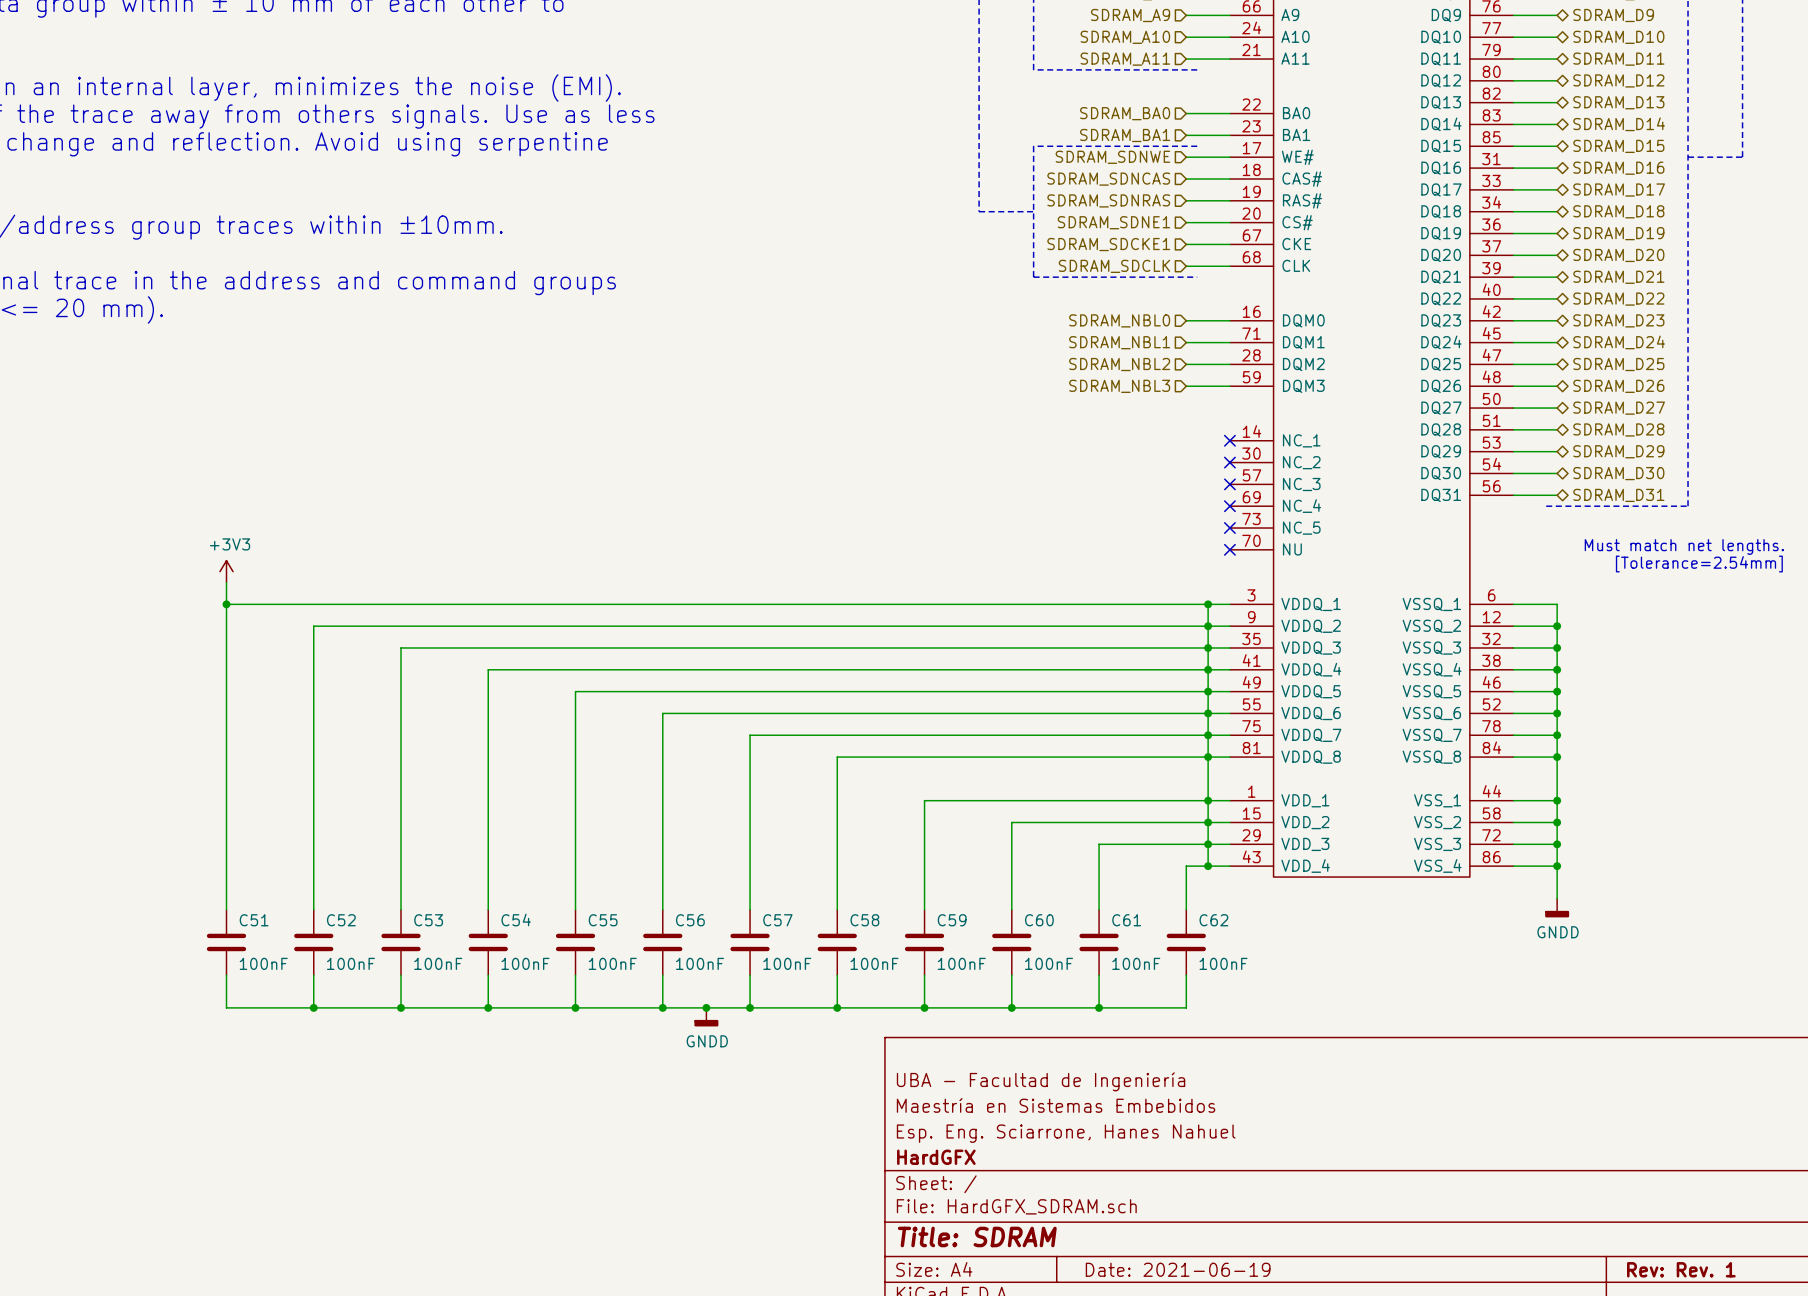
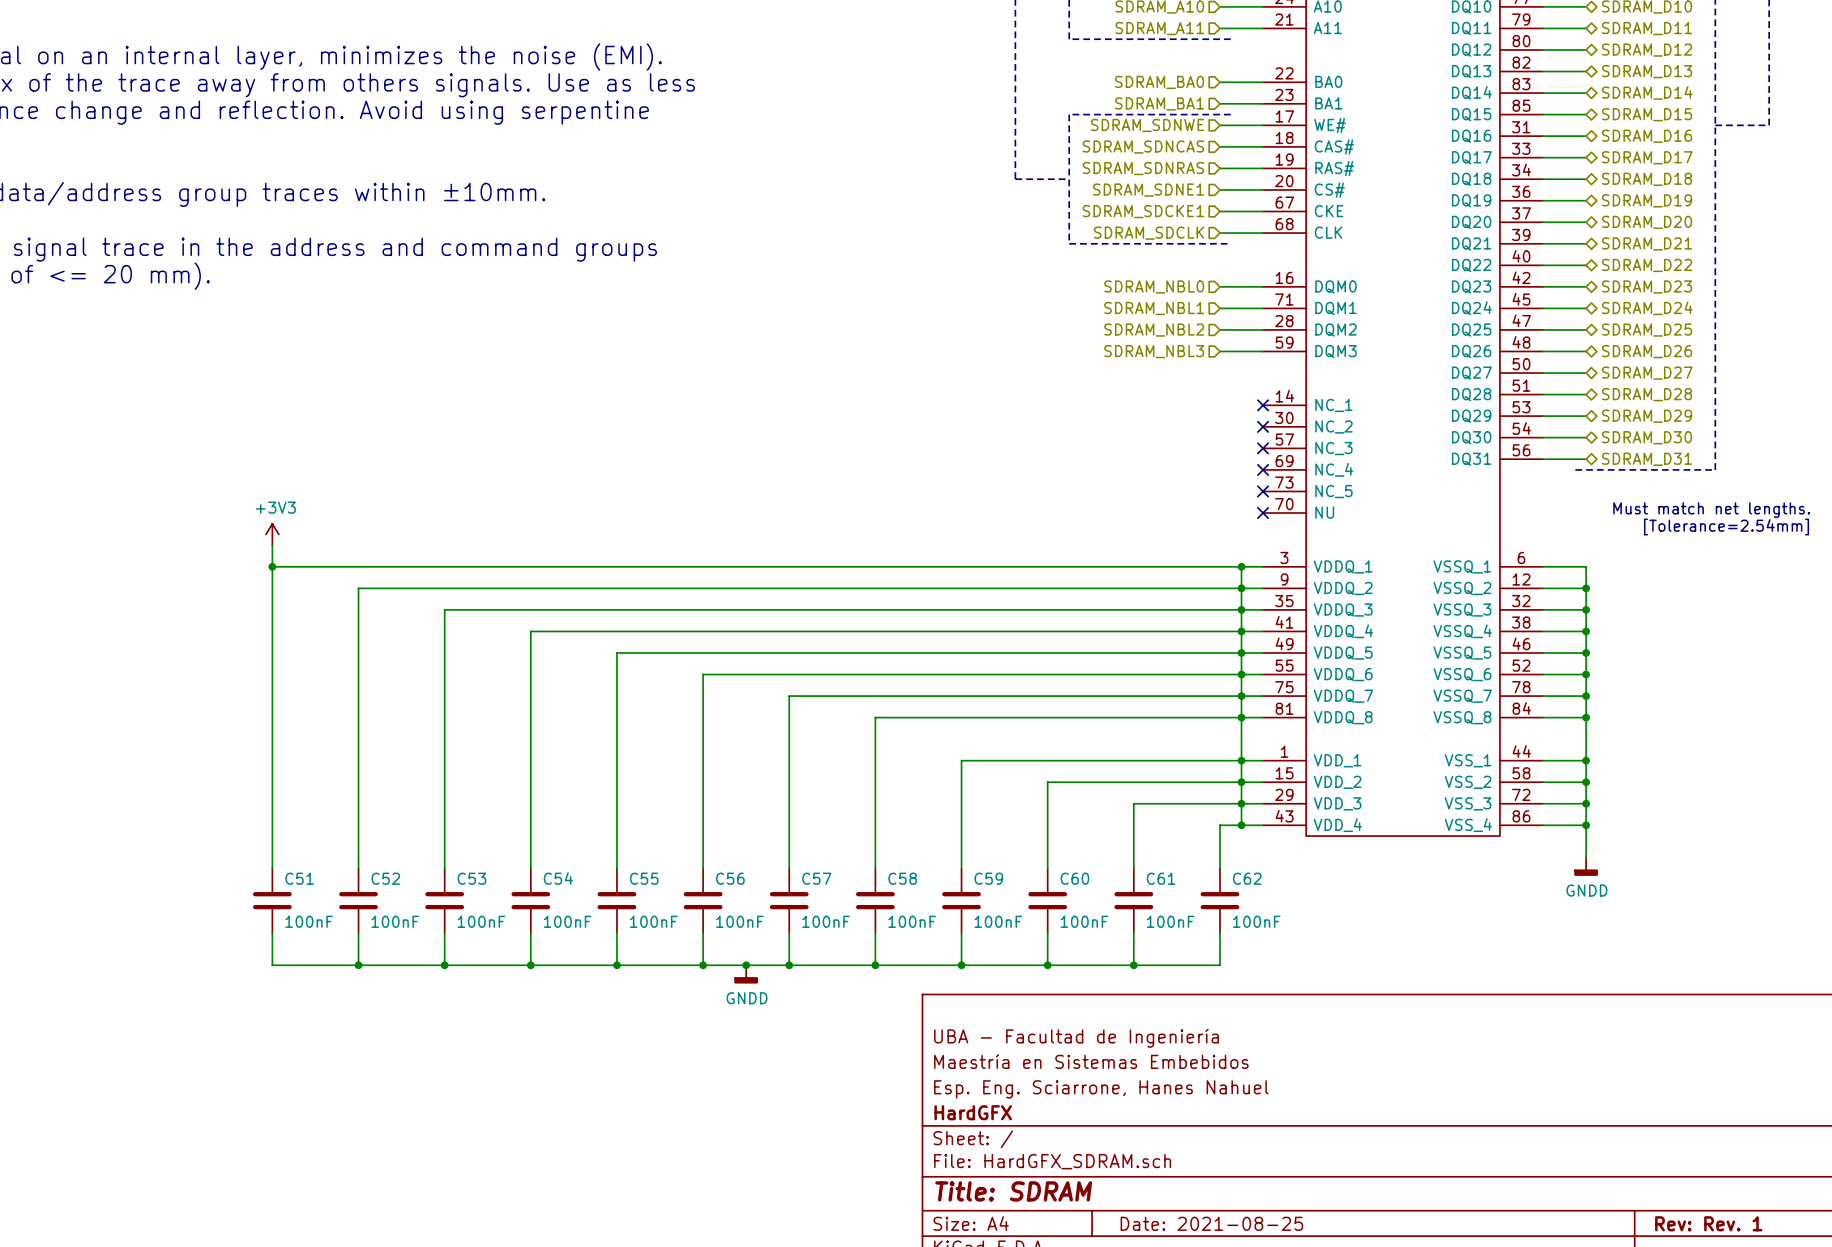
title block: Date: 2021-06-19 (1178, 1269) -> Date: 2021-08-25 (1211, 1223)

